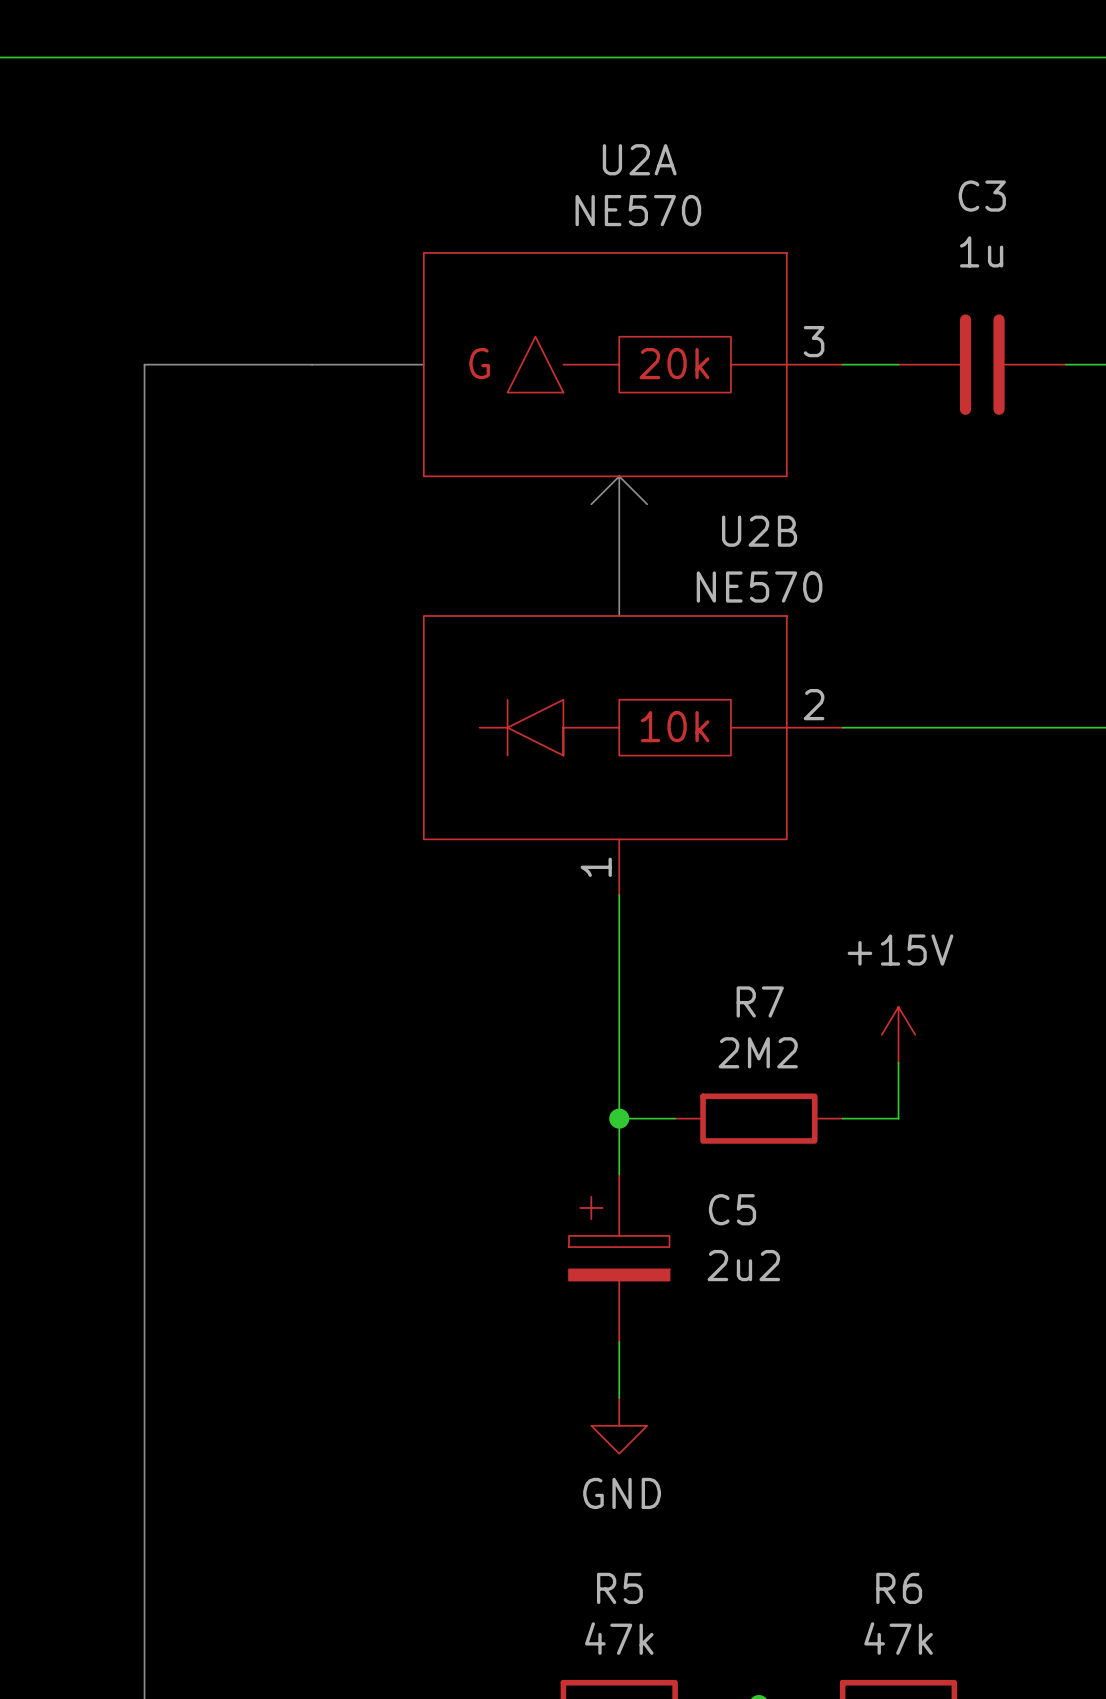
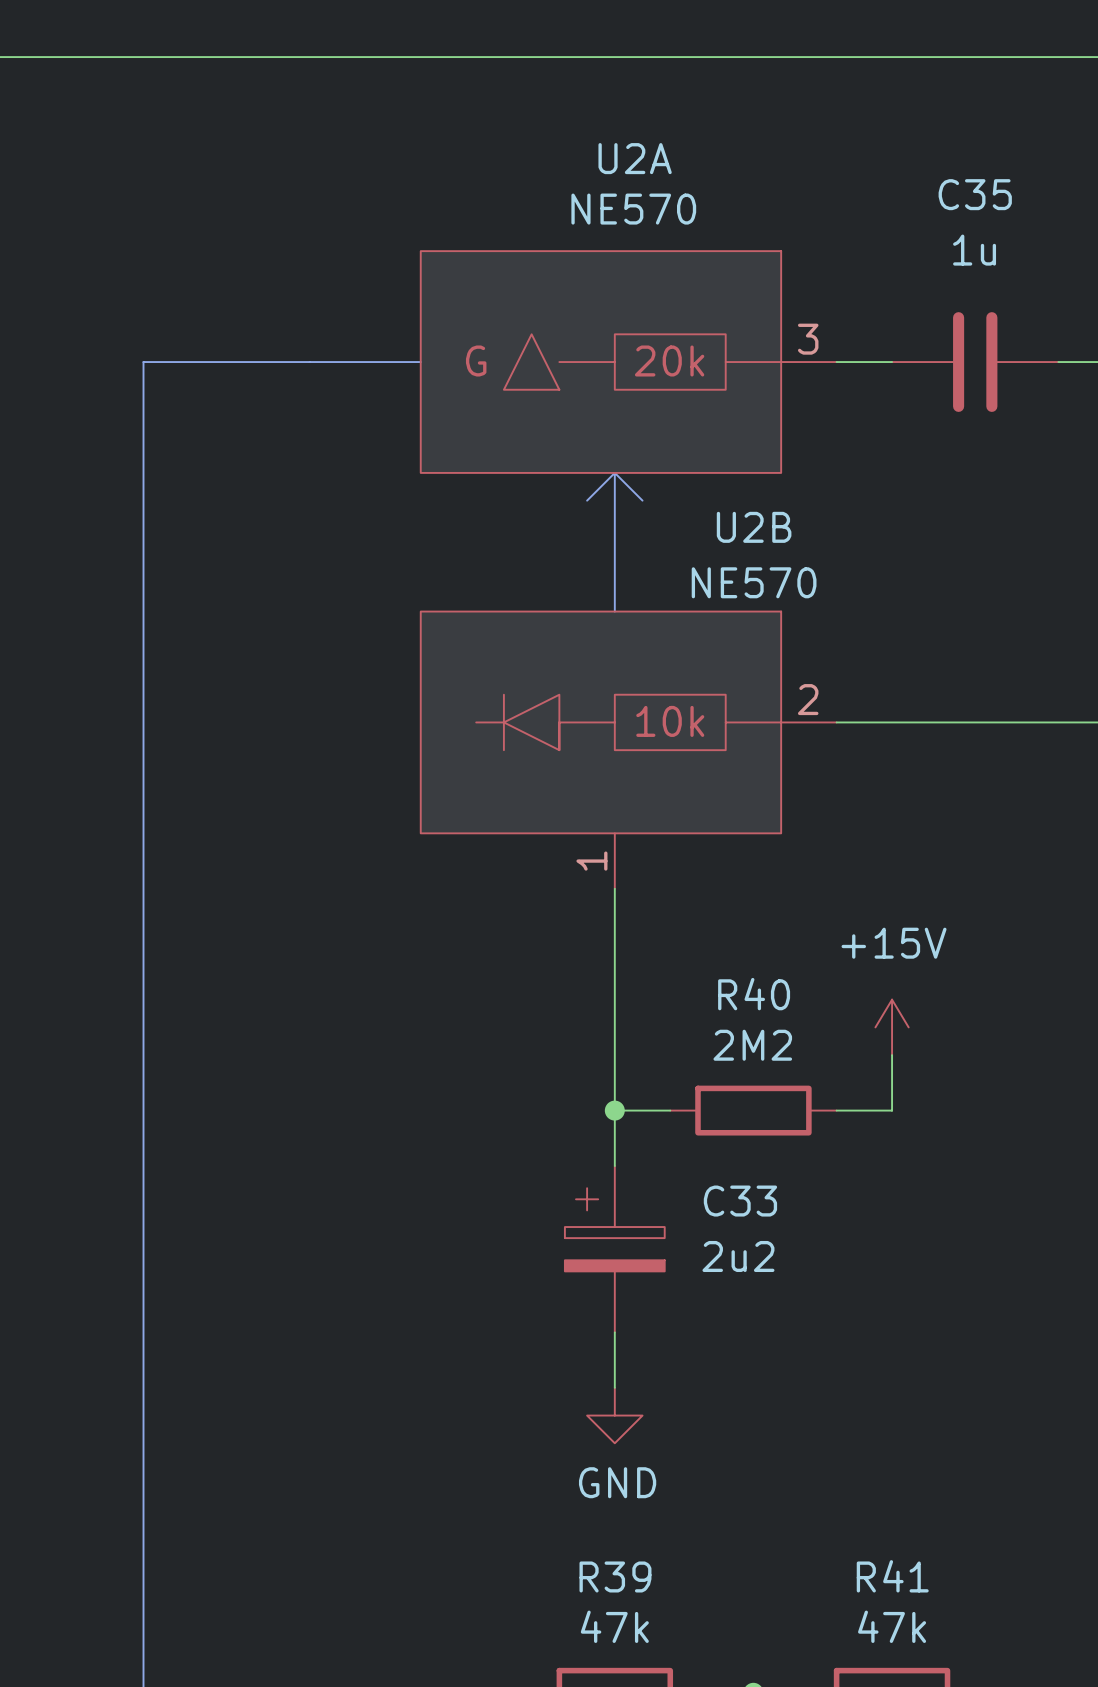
C3 name: C3 (982, 196) -> C35 (975, 194)
R7 name: R7 (760, 1001) -> R40 (754, 994)
C5 name: C5 (732, 1209) -> C33 (740, 1201)
R5 name: R5 (619, 1588) -> R39 (615, 1576)
R6 name: R6 (899, 1588) -> R41 (892, 1576)

